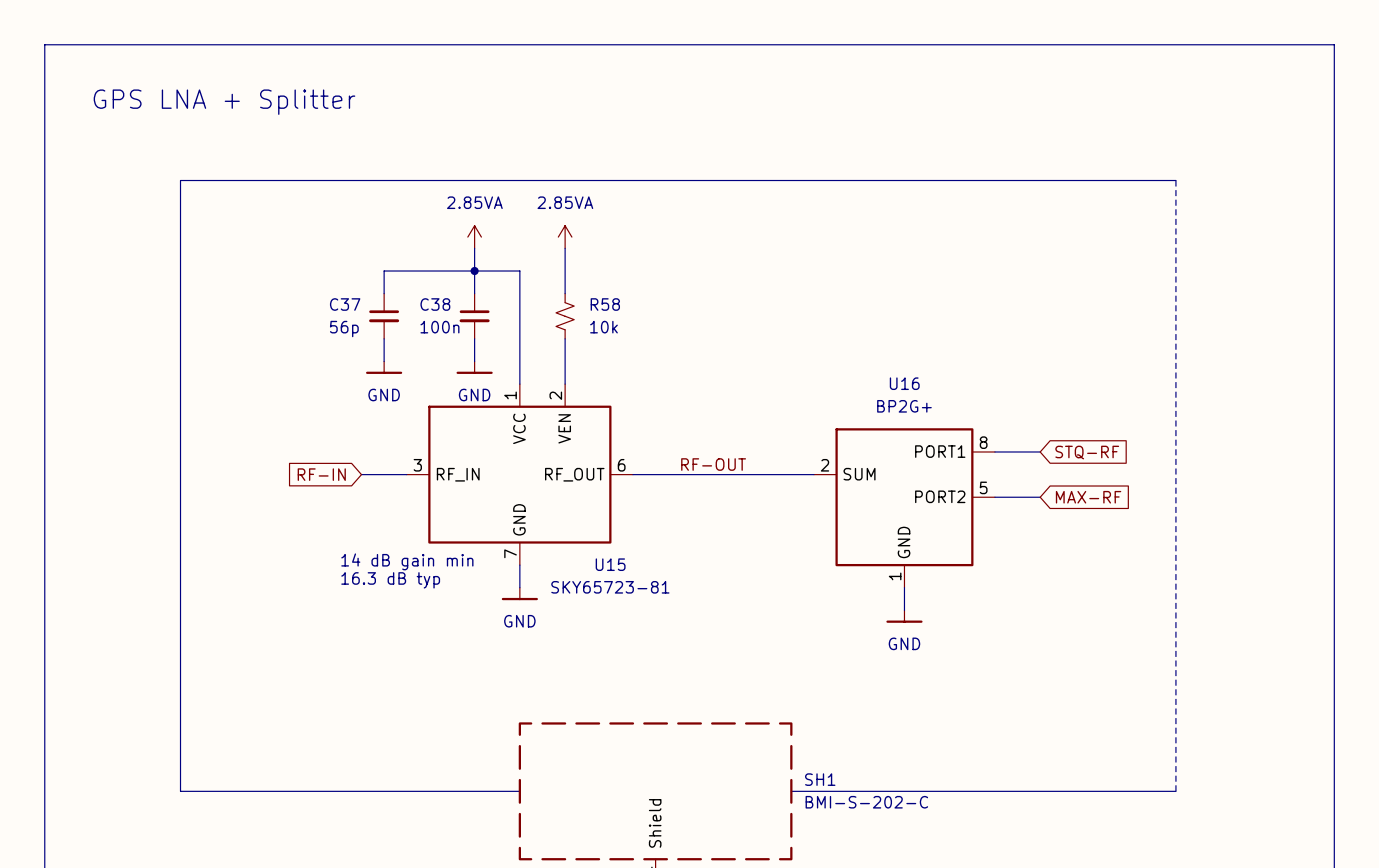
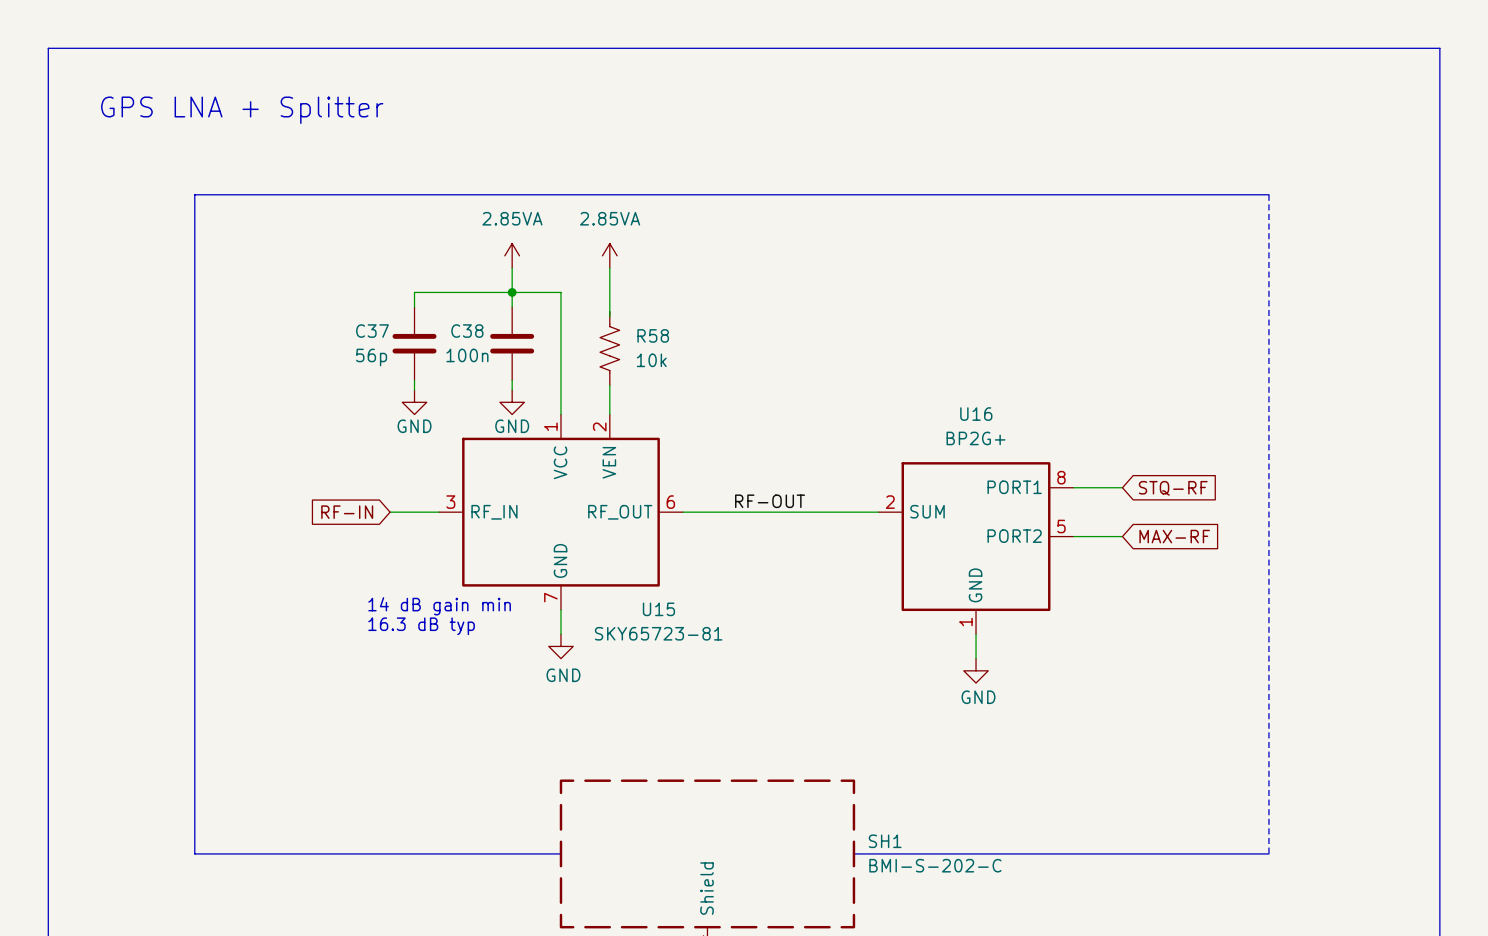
C37 symbol: [369, 293, 400, 339] -> [392, 307, 437, 381]
C38 symbol: [459, 293, 490, 339] -> [490, 307, 535, 381]
R58 symbol: [556, 293, 575, 339] -> [600, 311, 620, 386]
power symbol shape: [366, 361, 403, 374] -> [402, 390, 427, 415]
power symbol shape: [456, 361, 493, 374] -> [499, 390, 525, 415]
power symbol shape: [501, 587, 538, 601] -> [548, 634, 574, 659]
power symbol shape: [886, 610, 923, 623] -> [963, 658, 989, 684]

